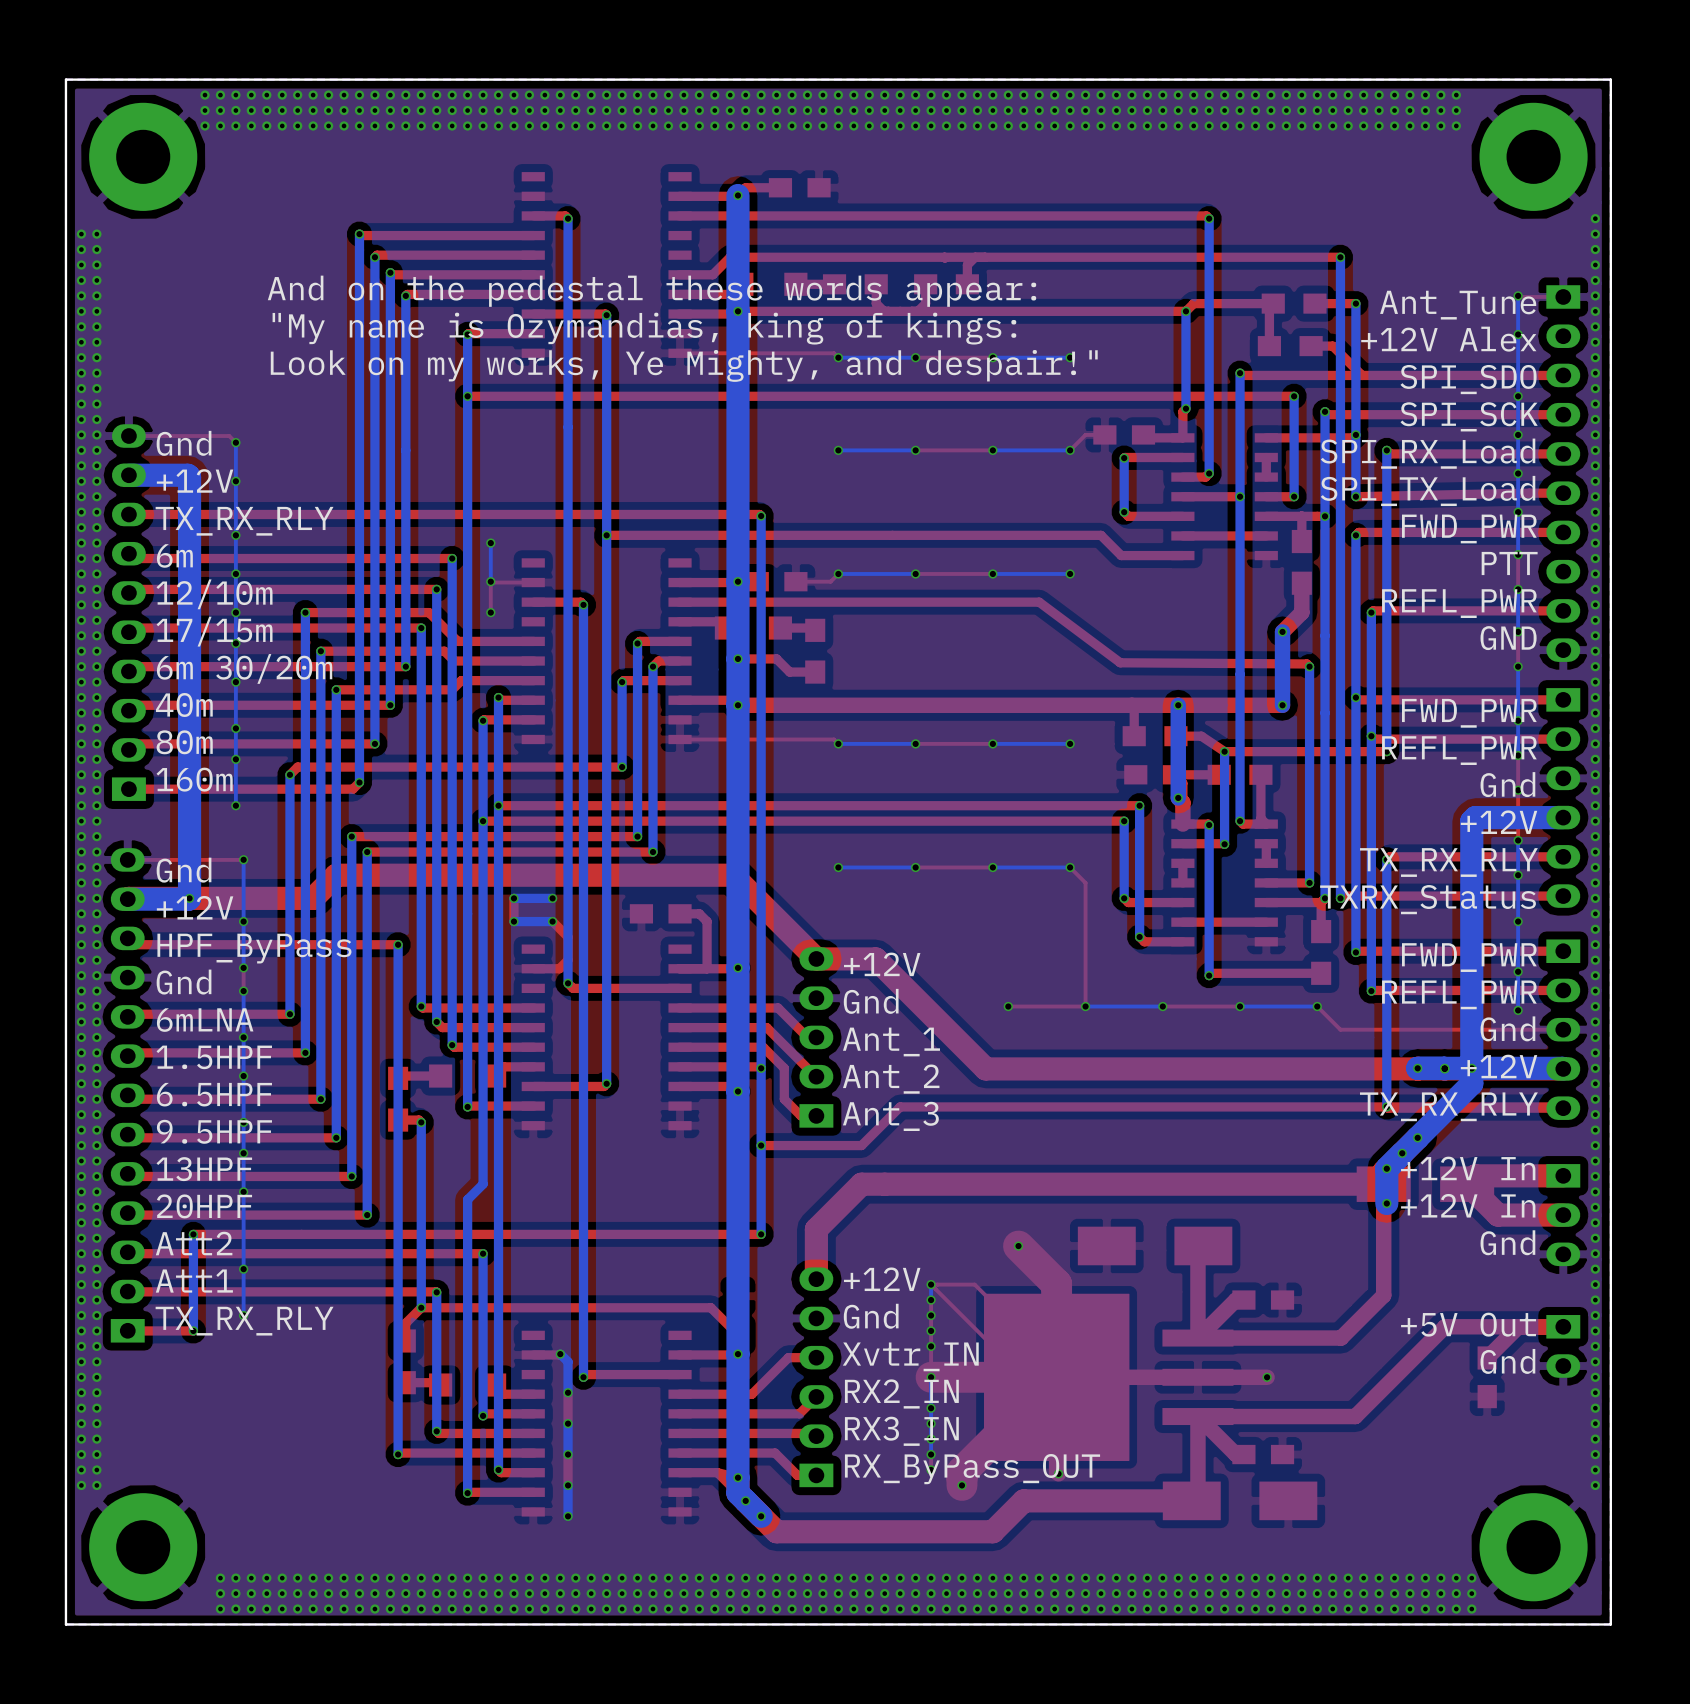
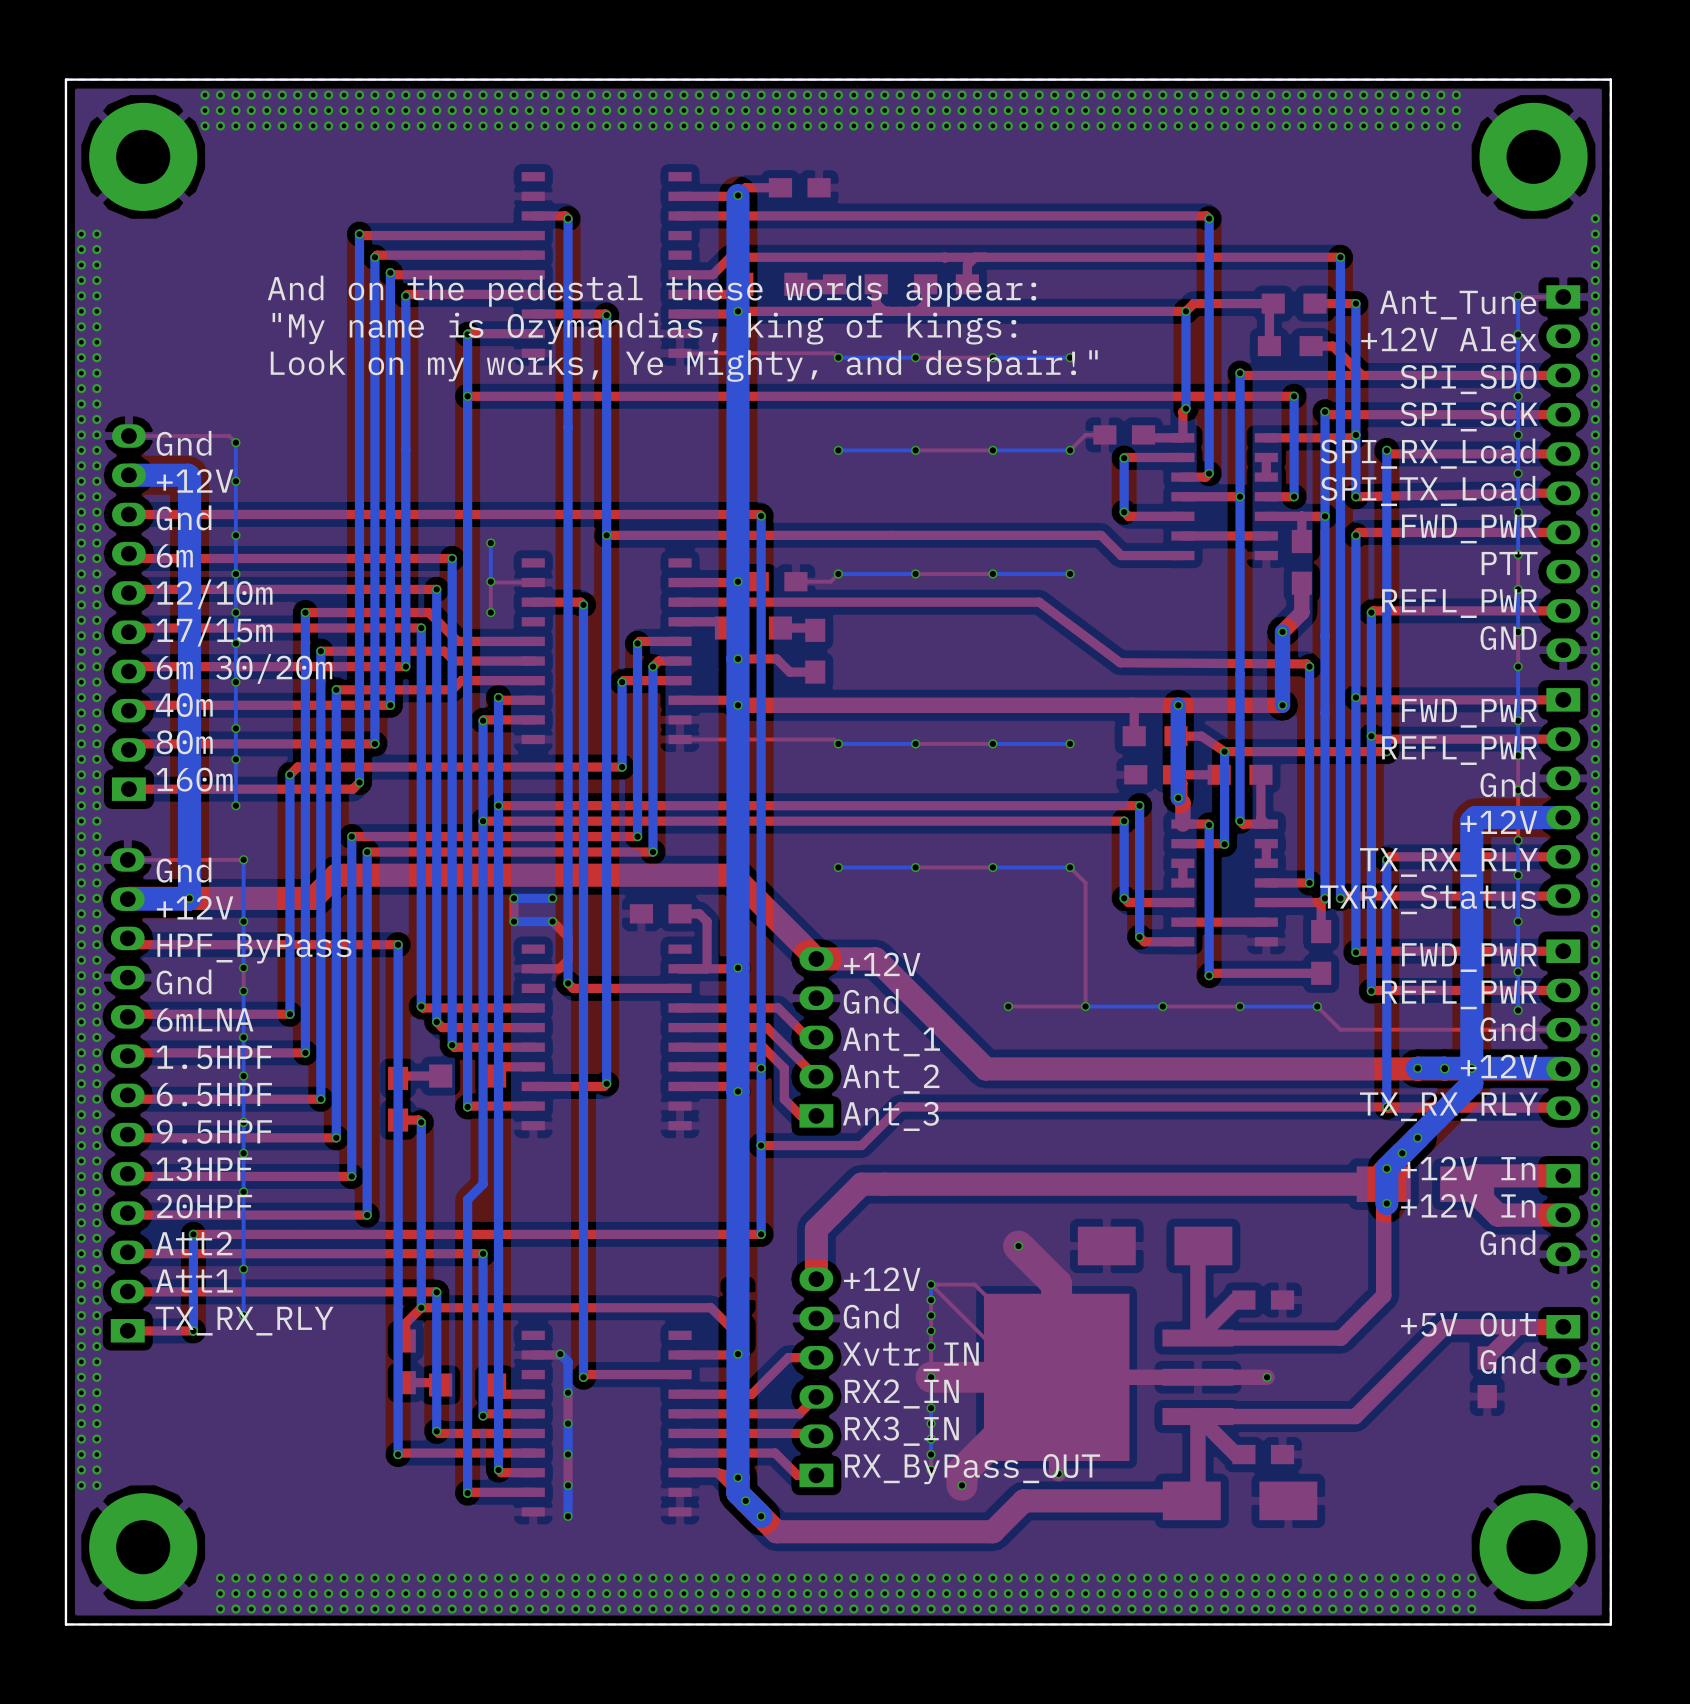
text: TX_RX_RLY (244, 521) -> Gnd (184, 517)

